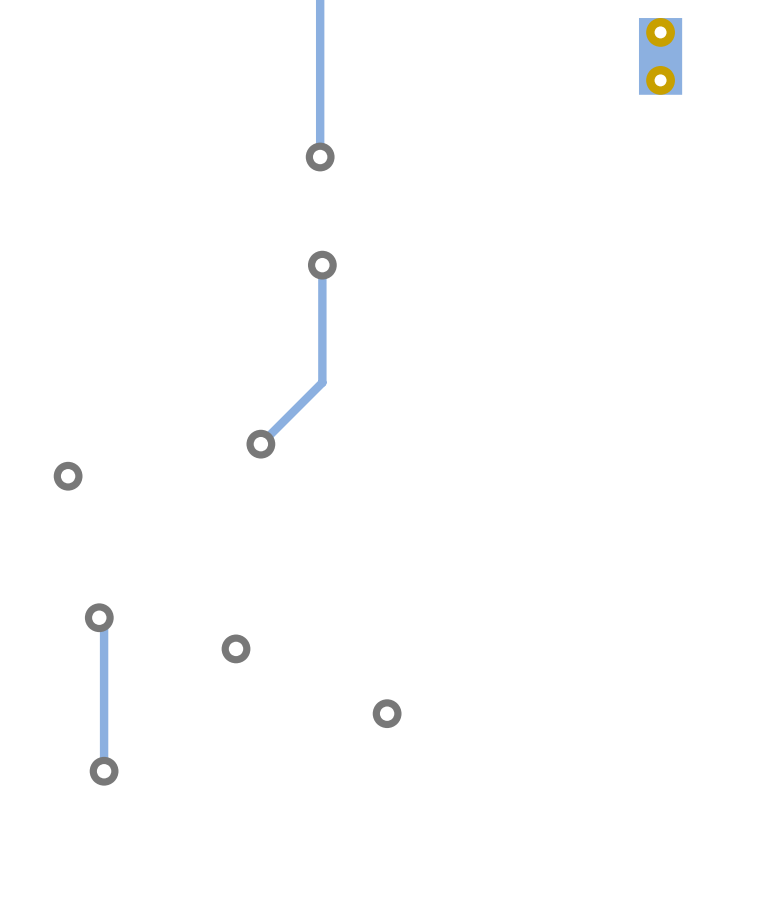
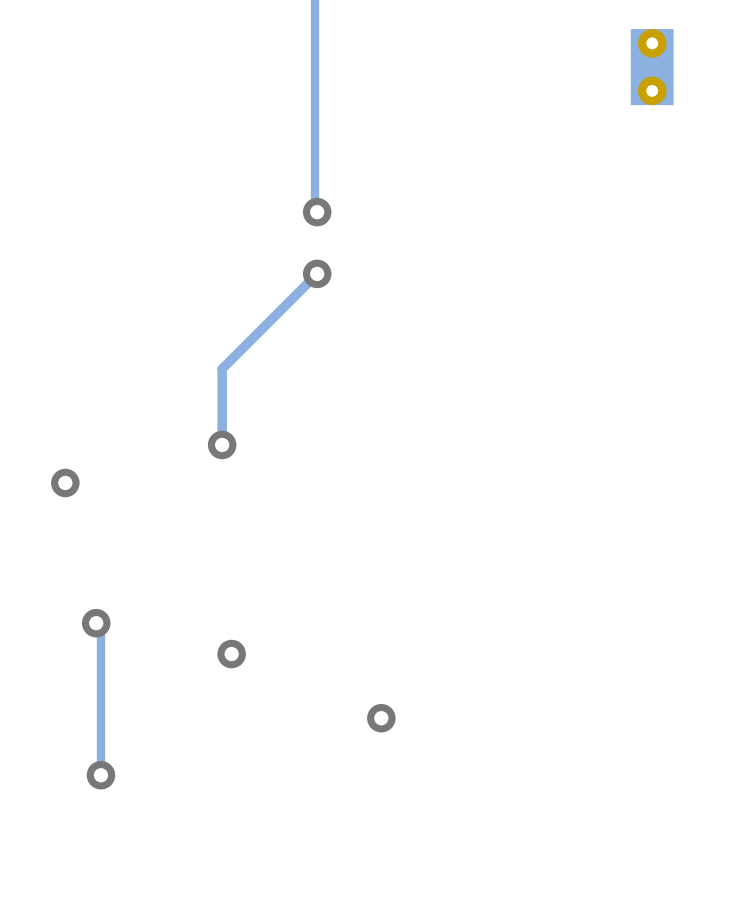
track: none -> (315, 166) (315, 209) (317, 212)
via position: (320, 157) -> (317, 212)
track: (322, 265) (322, 382) (260, 444) -> (317, 273) (222, 368) (222, 444)
via position: (260, 444) -> (222, 444)

